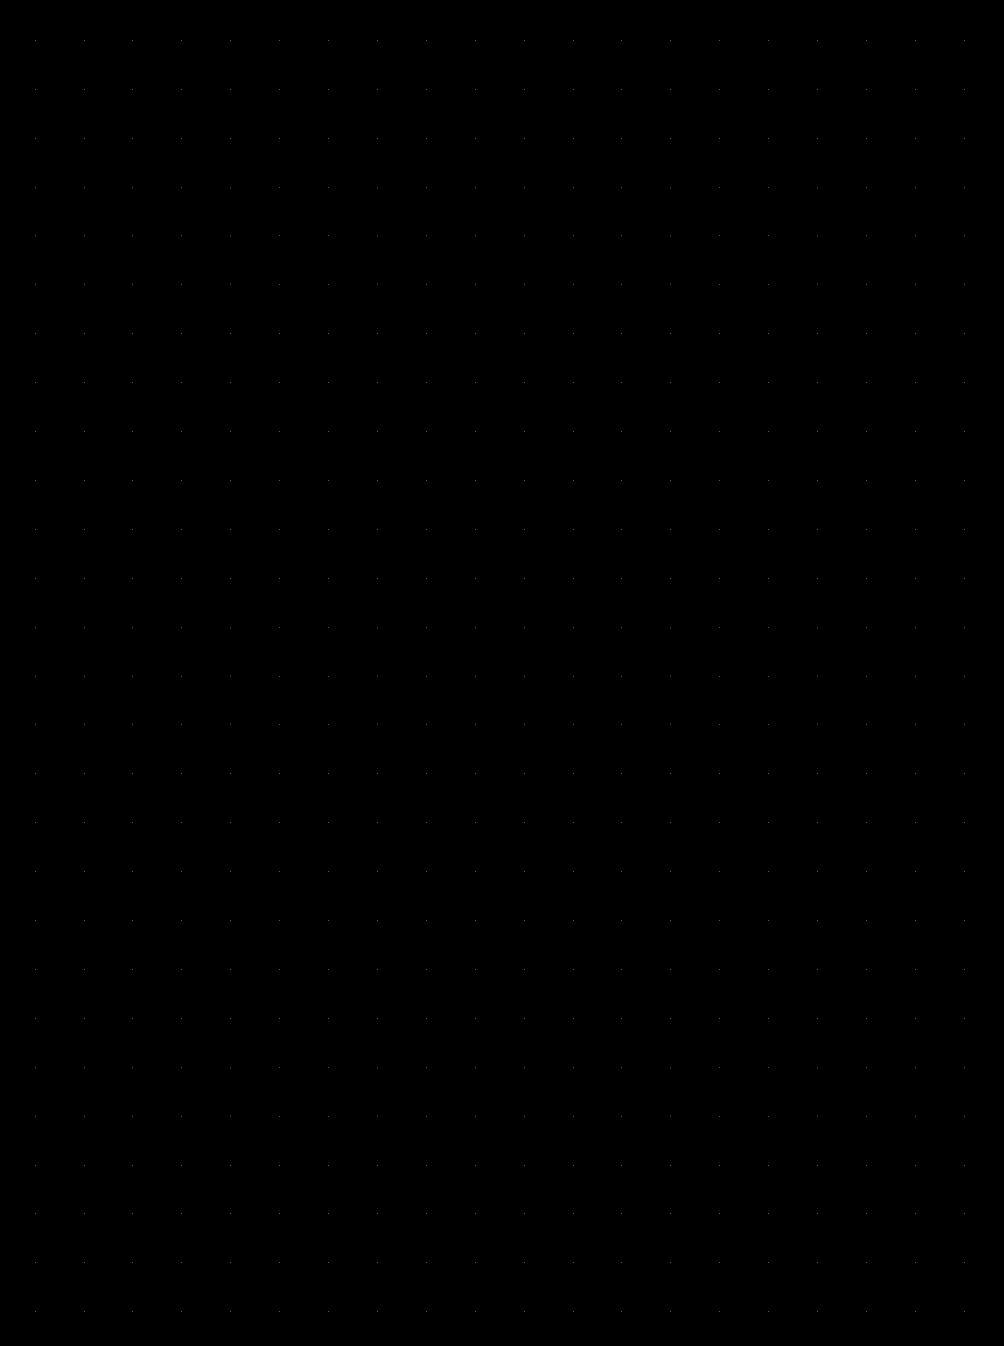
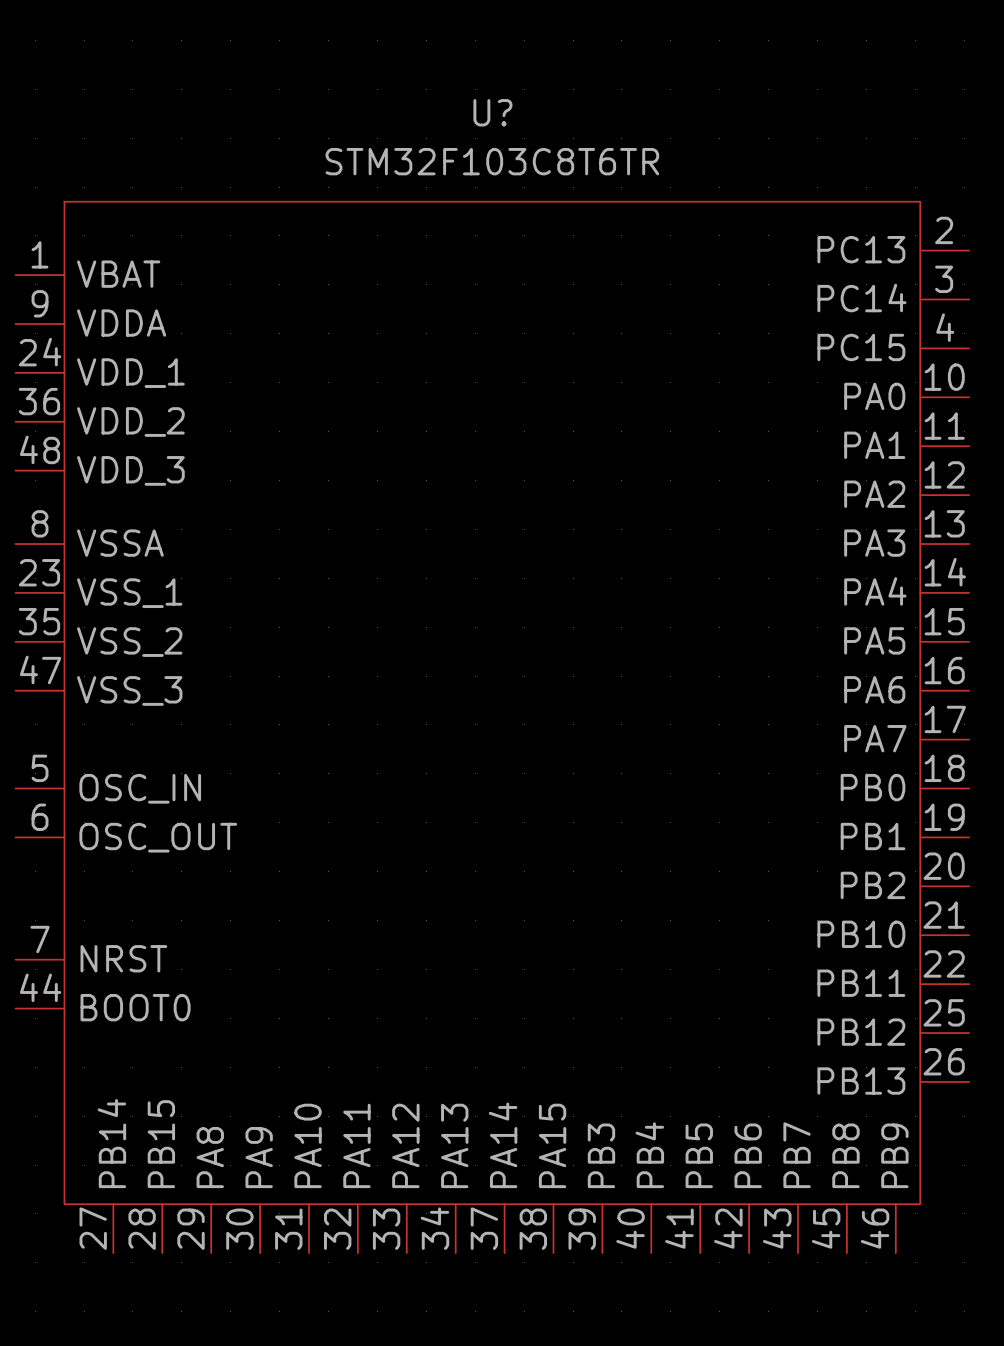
U?: none -> STM32F103C8T6TR (492, 727)

